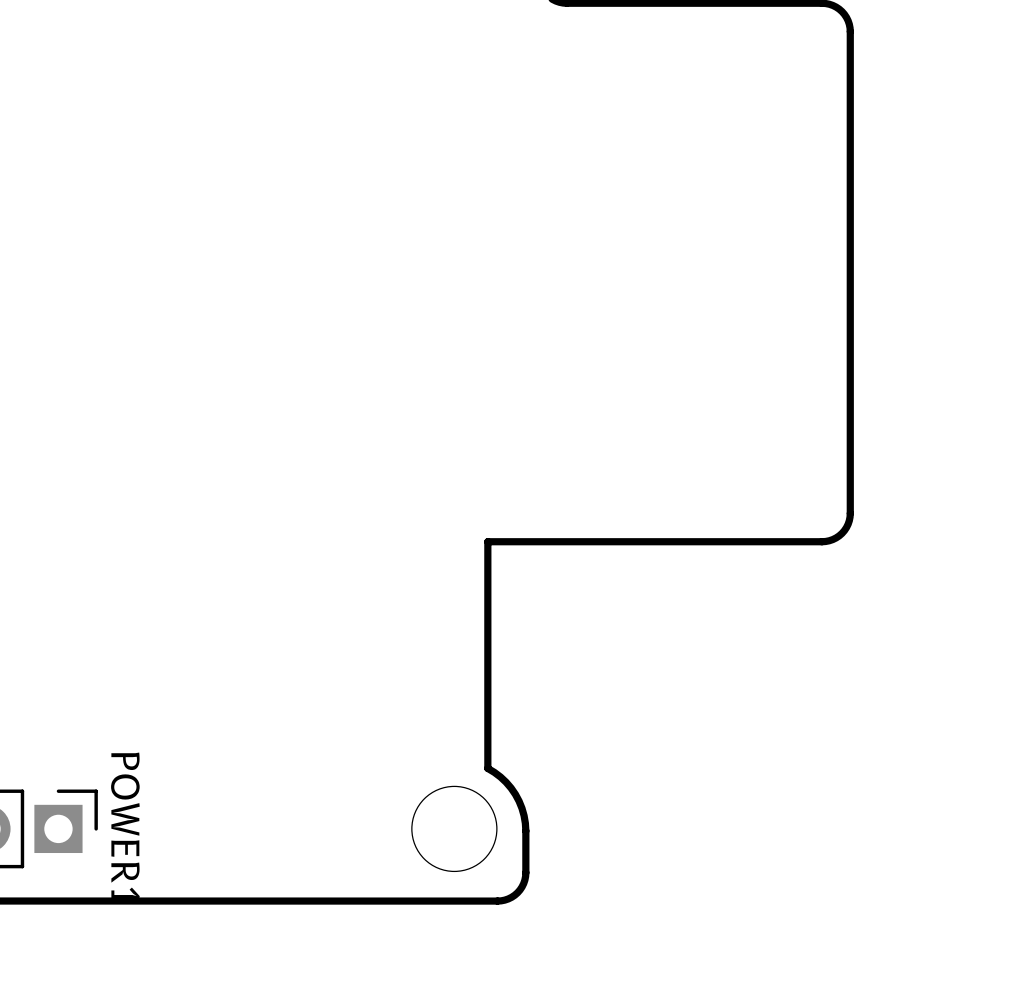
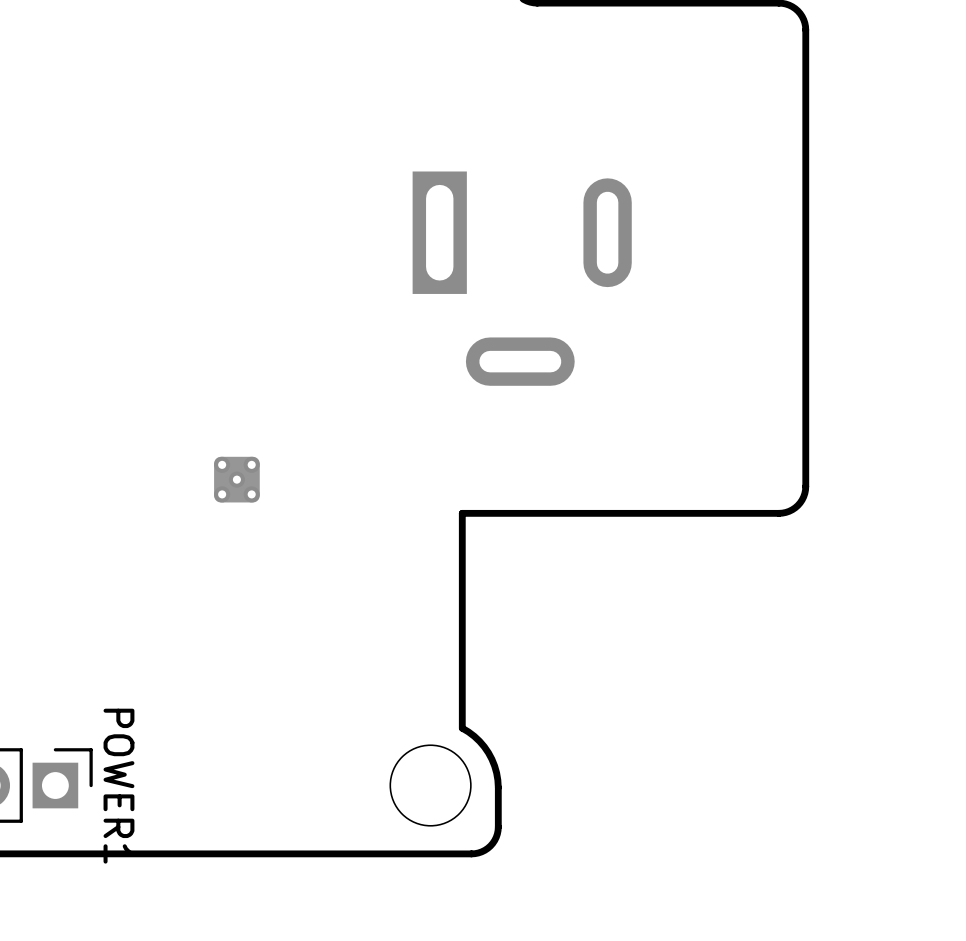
part: none -> (522, 278)
part: none -> (236, 479)

